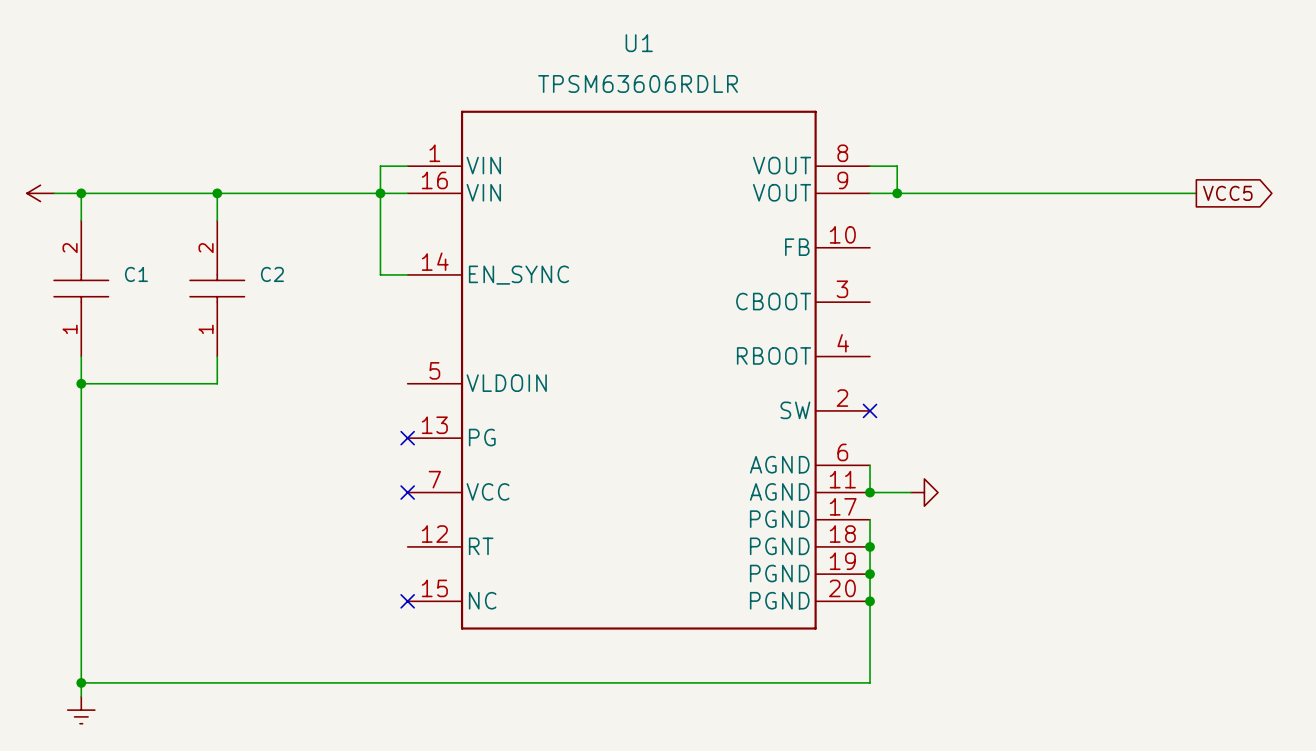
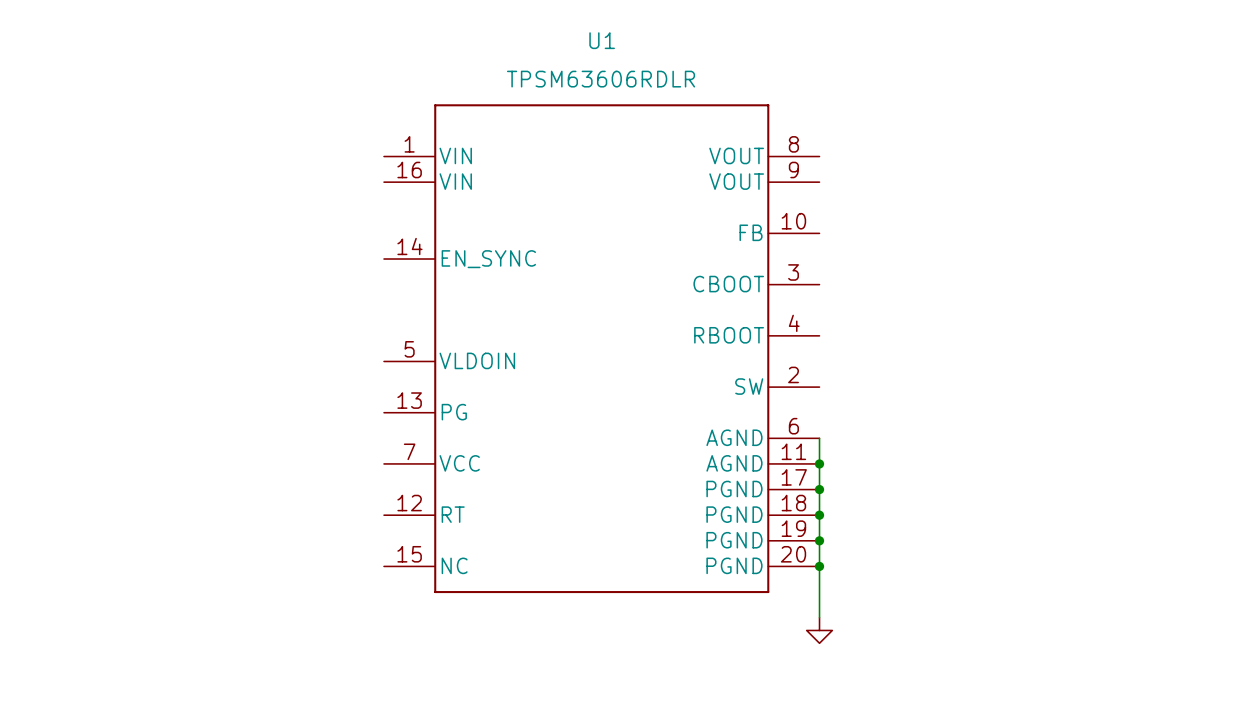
wire: (407, 166) (380, 166) (380, 274) (407, 274) -> none
wire: (870, 166) (897, 166) (897, 193) -> none
power symbol: (40, 193) -> none
wire: (54, 193) (407, 193) -> none
wire: (81, 193) (81, 220) -> none
junction: (81, 193) -> none
wire: (217, 193) (217, 220) -> none
junction: (217, 193) -> none
junction: (380, 193) -> none
wire: (870, 193) (1196, 193) -> none
junction: (897, 193) -> none
global label: VCC5 (1227, 193) -> none
C1: (81, 288) -> none
C2: (217, 288) -> none
wire: (81, 356) (81, 696) -> none
wire: (217, 356) (217, 383) (81, 383) -> none
junction: (81, 383) -> none
no-connect mark: (870, 410) -> none
no-connect mark: (407, 438) -> none
no-connect mark: (407, 492) -> none
wire: (870, 492) (910, 492) -> (819, 463) (819, 489)
power symbol rotation: 0° (924, 492) -> 90° clockwise (819, 630)
power symbol position: (924, 492) -> (819, 630)
junction: none -> (819, 489)
no-connect mark: (407, 601) -> none
wire: (870, 655) (870, 682) (81, 682) -> none
junction: (81, 682) -> none
power symbol: (81, 710) -> none

